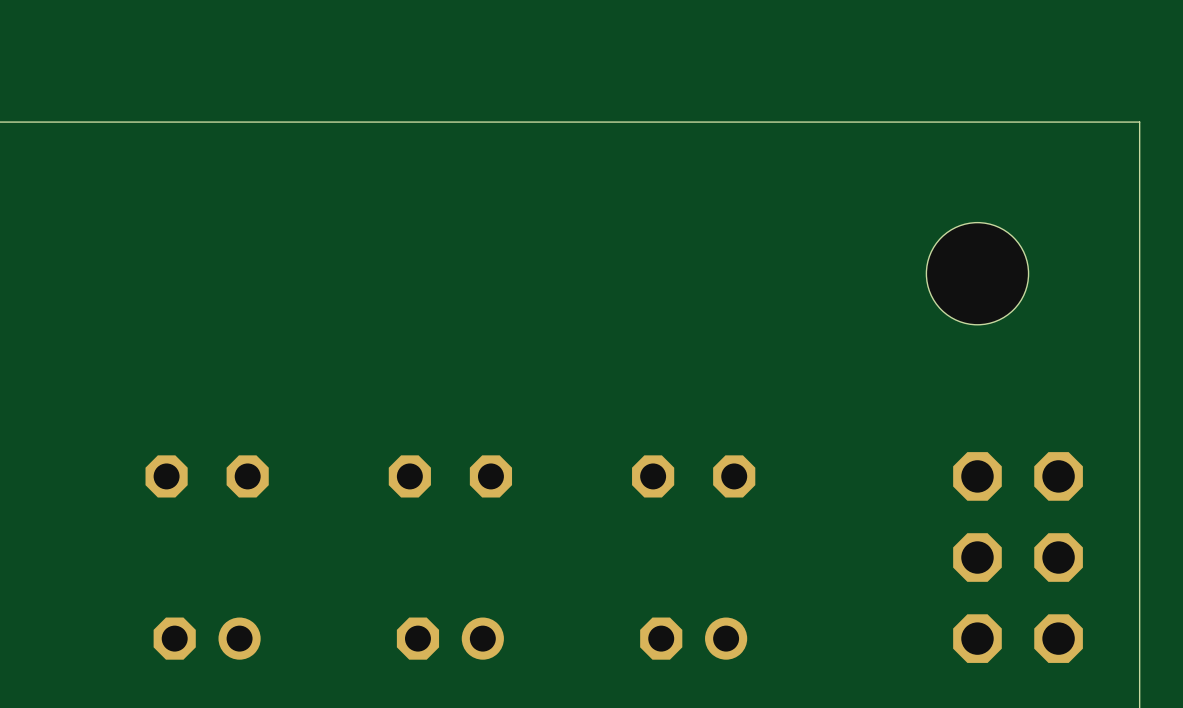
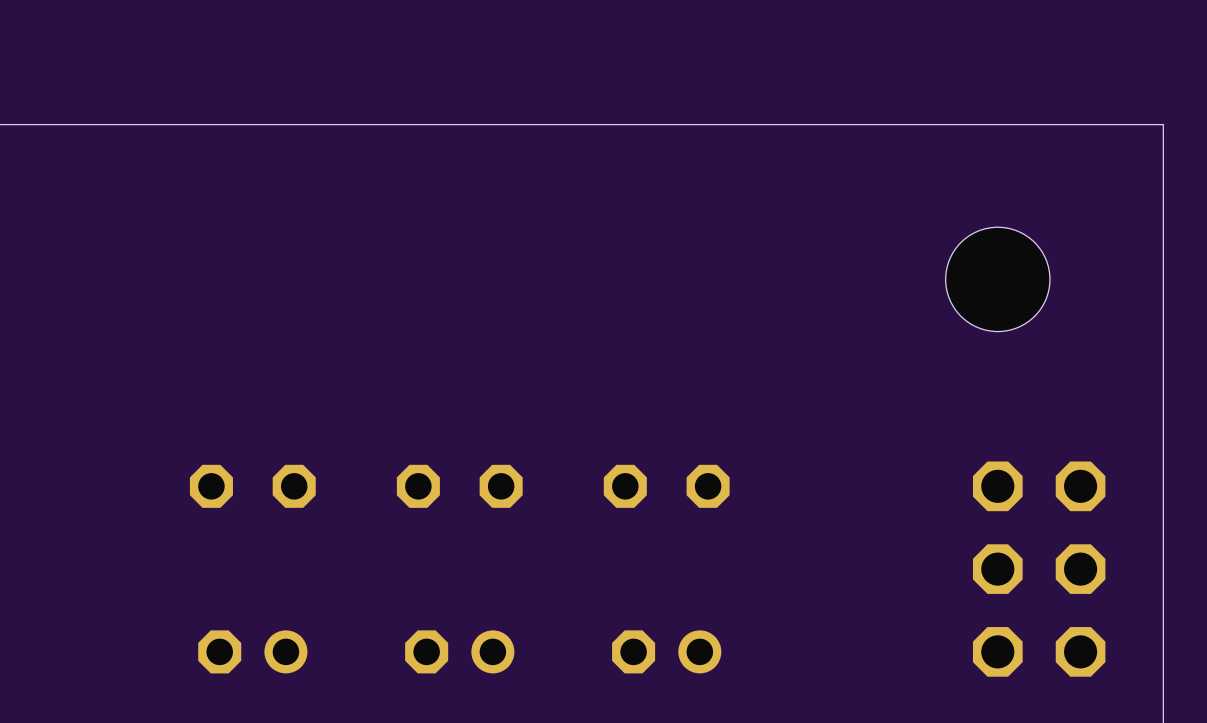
part position: (207, 476) -> (252, 486)
part position: (693, 476) -> (666, 486)
part position: (207, 638) -> (252, 651)
part position: (693, 638) -> (666, 651)

